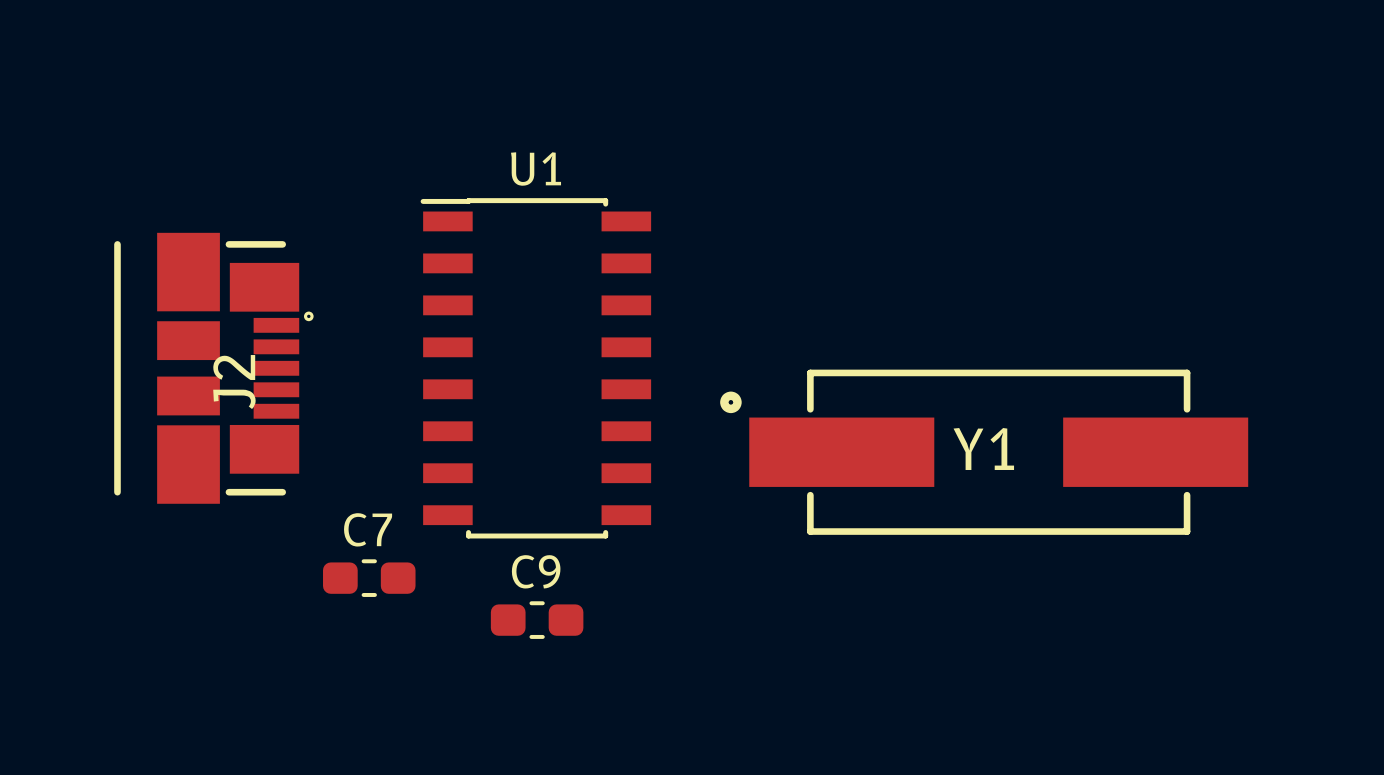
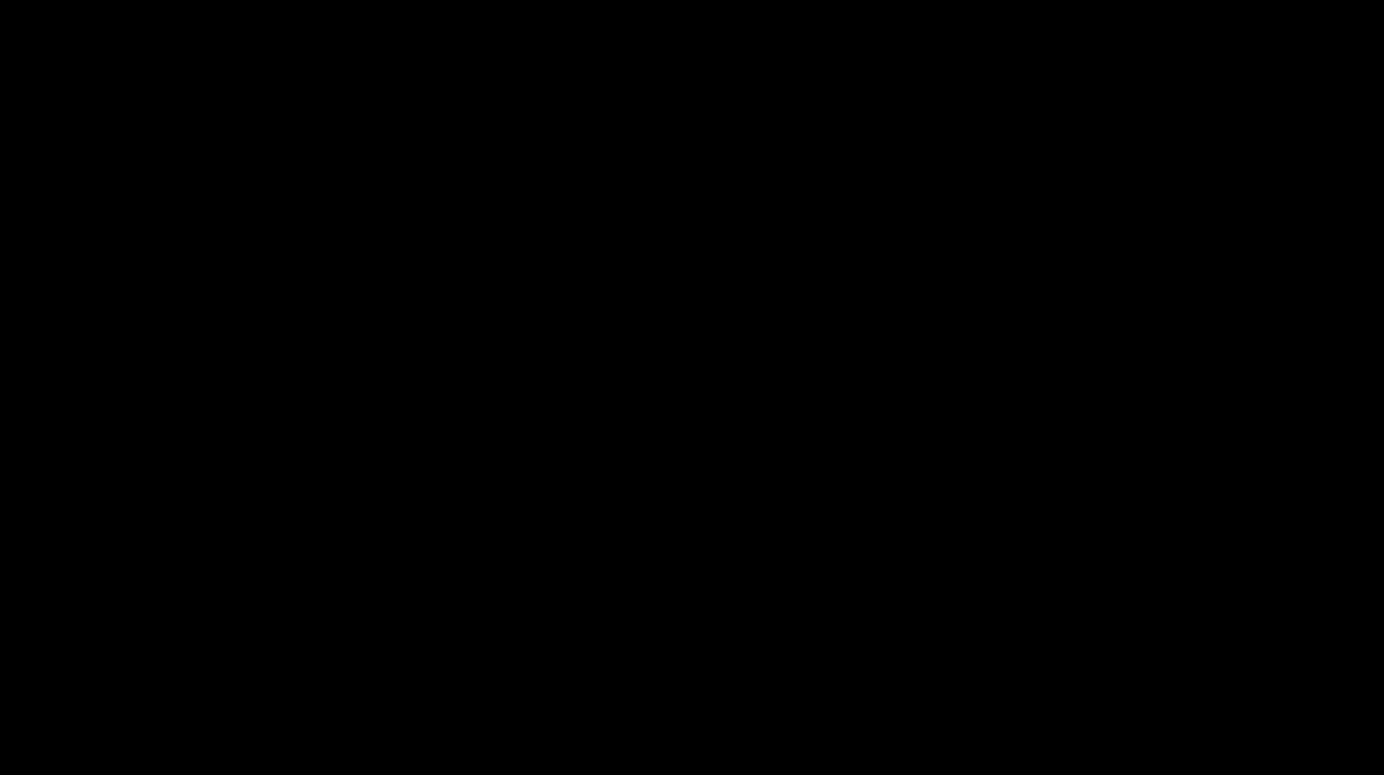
J2: (213, 368) -> none
U1: (535, 368) -> none
Y1: (984, 452) -> none
C7: (369, 578) -> none
C9: (537, 620) -> none

